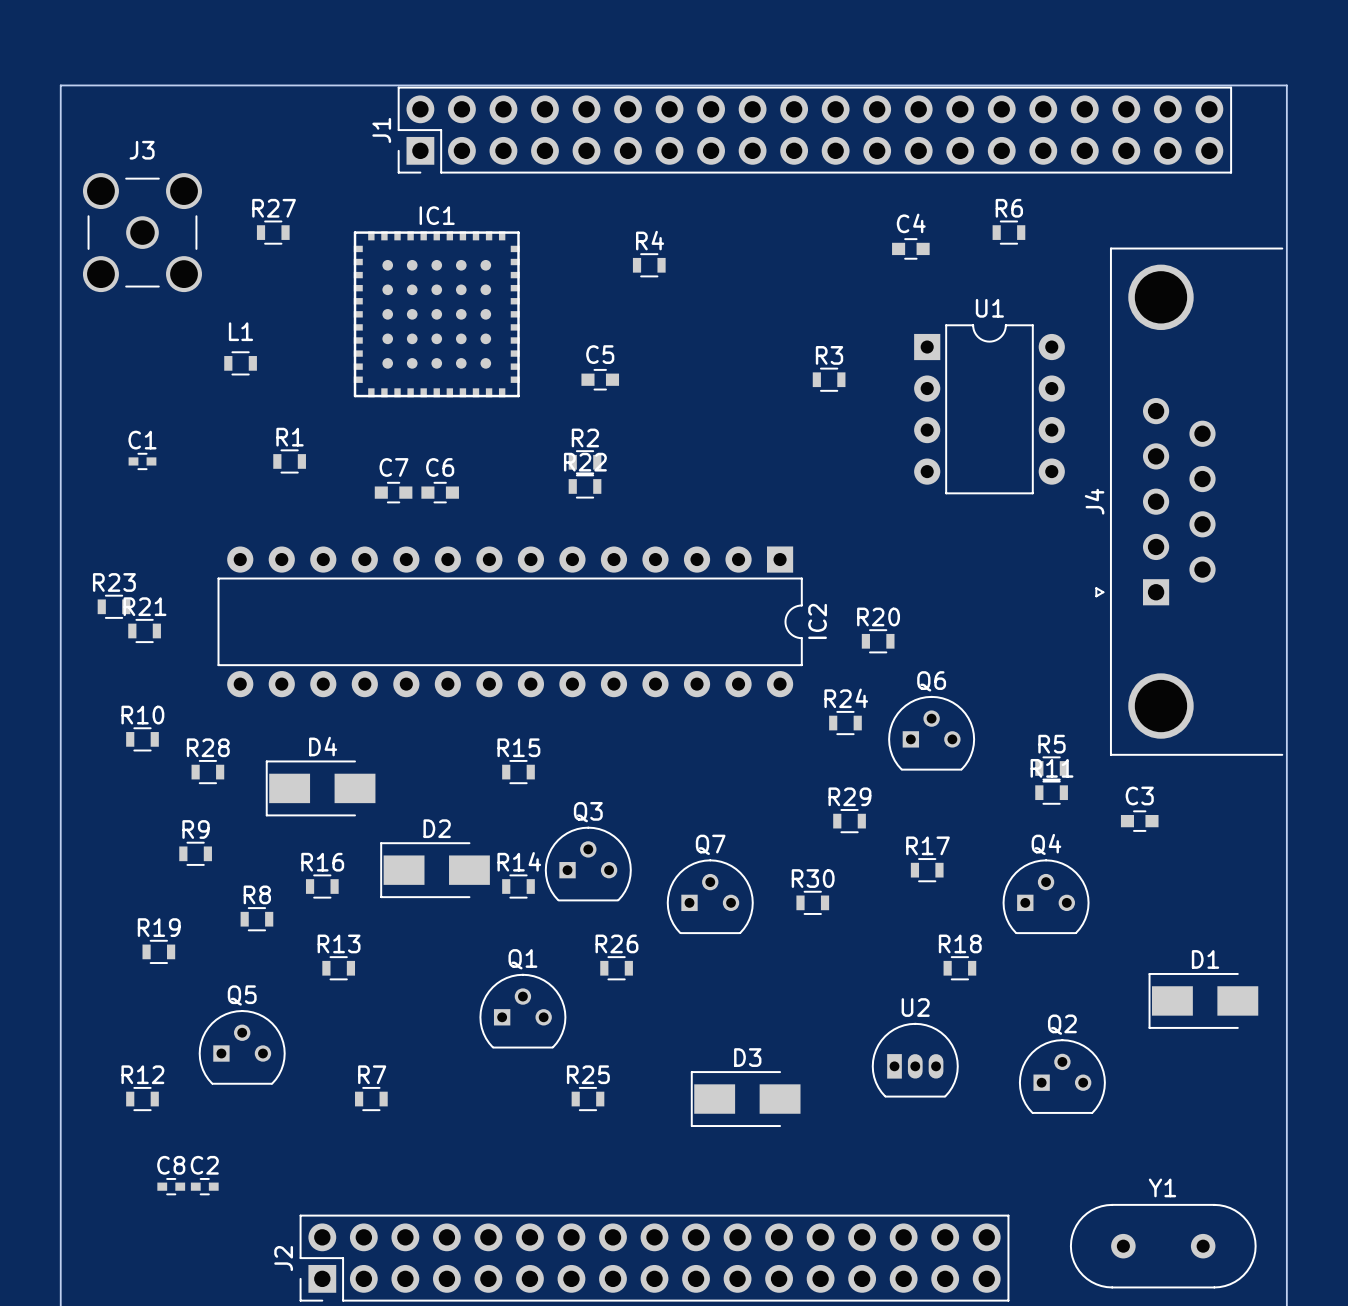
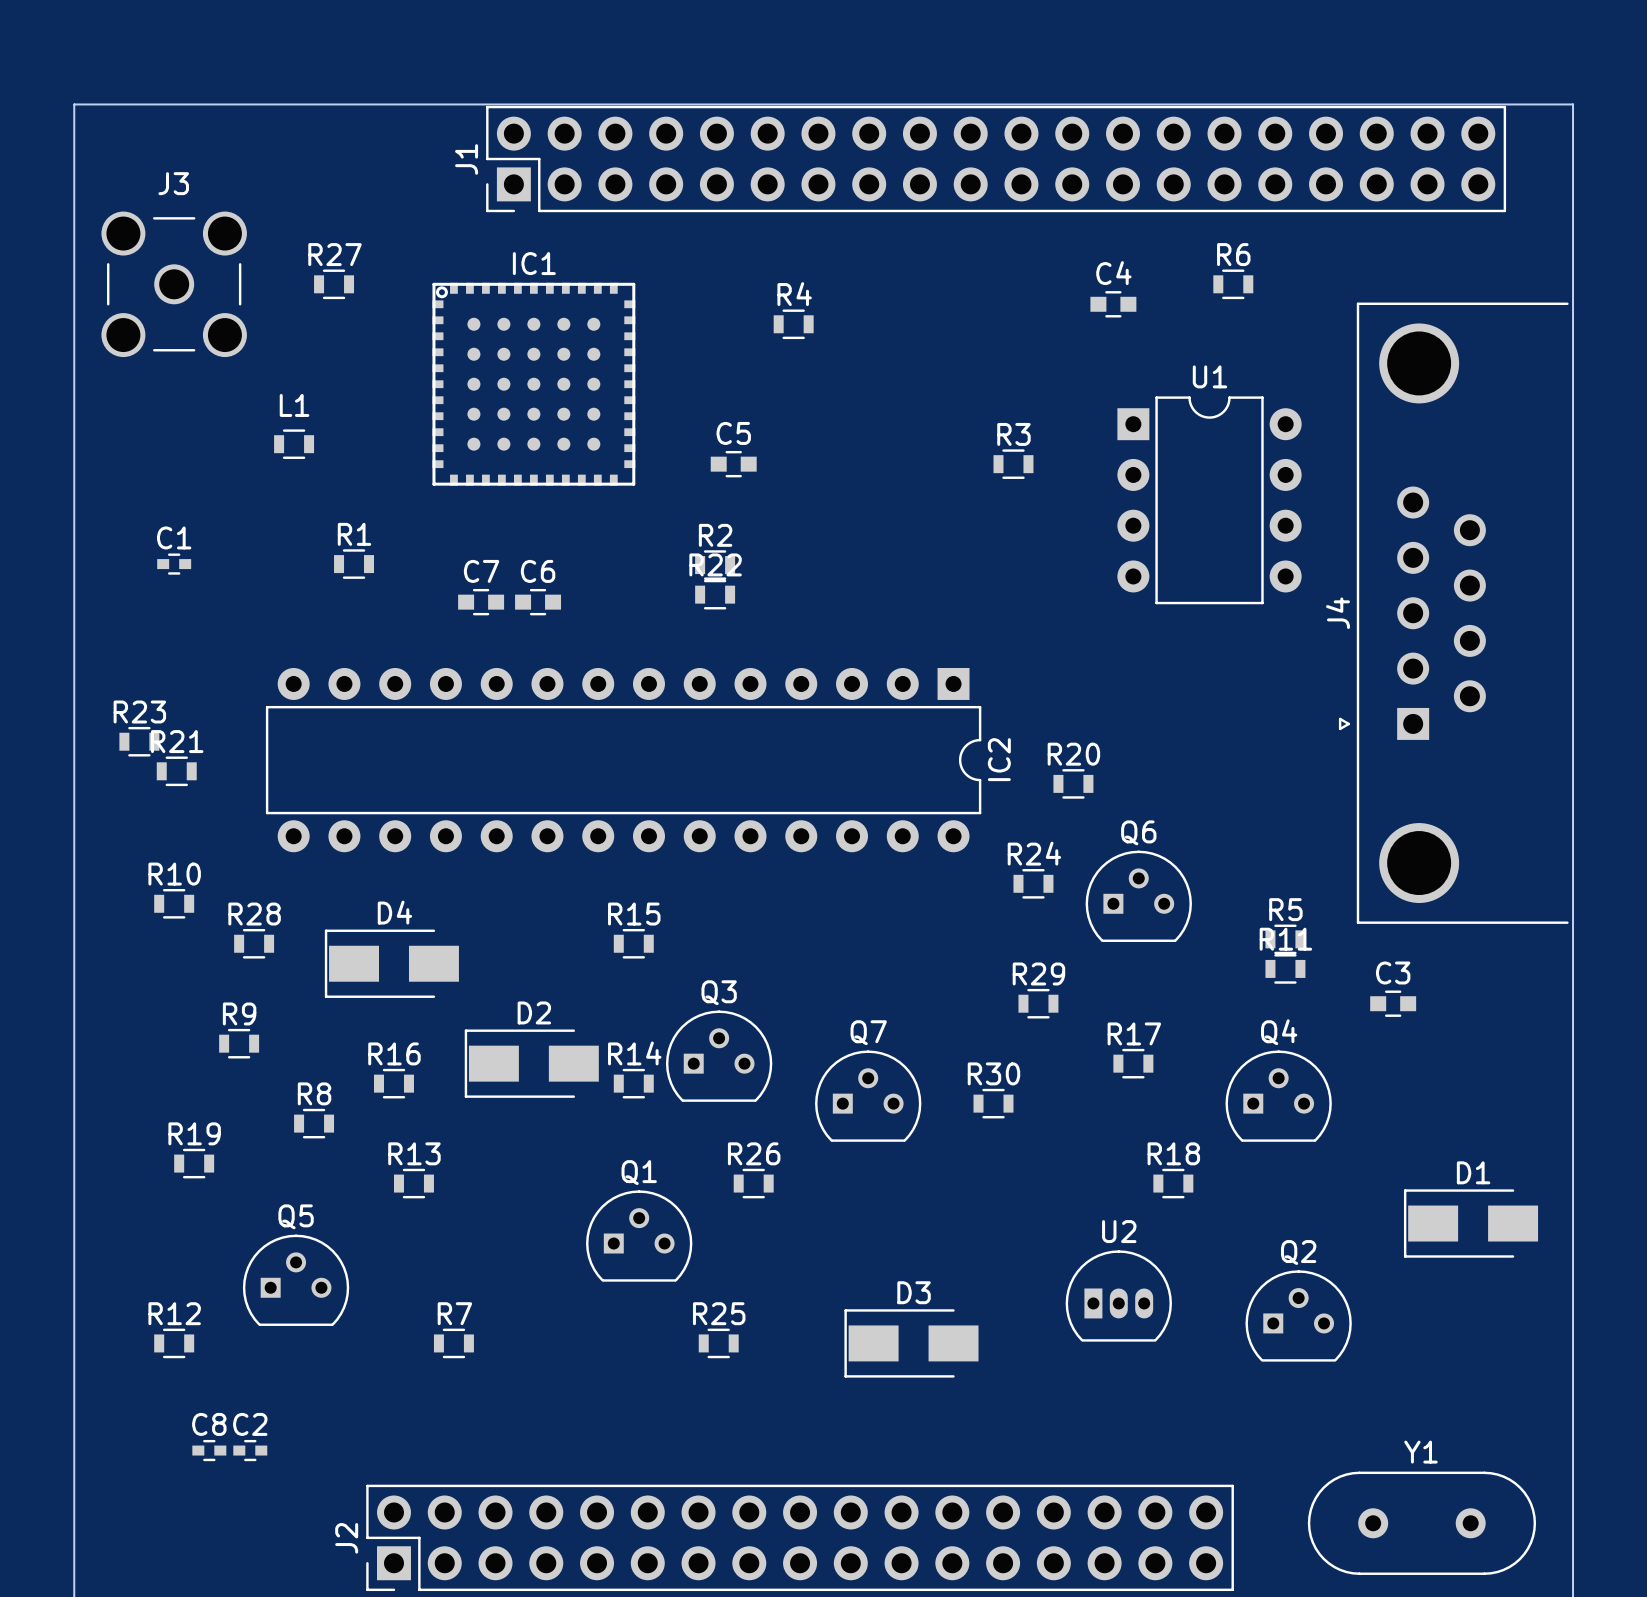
IC1 footprint: [353, 231, 520, 398] -> [432, 282, 636, 486]

